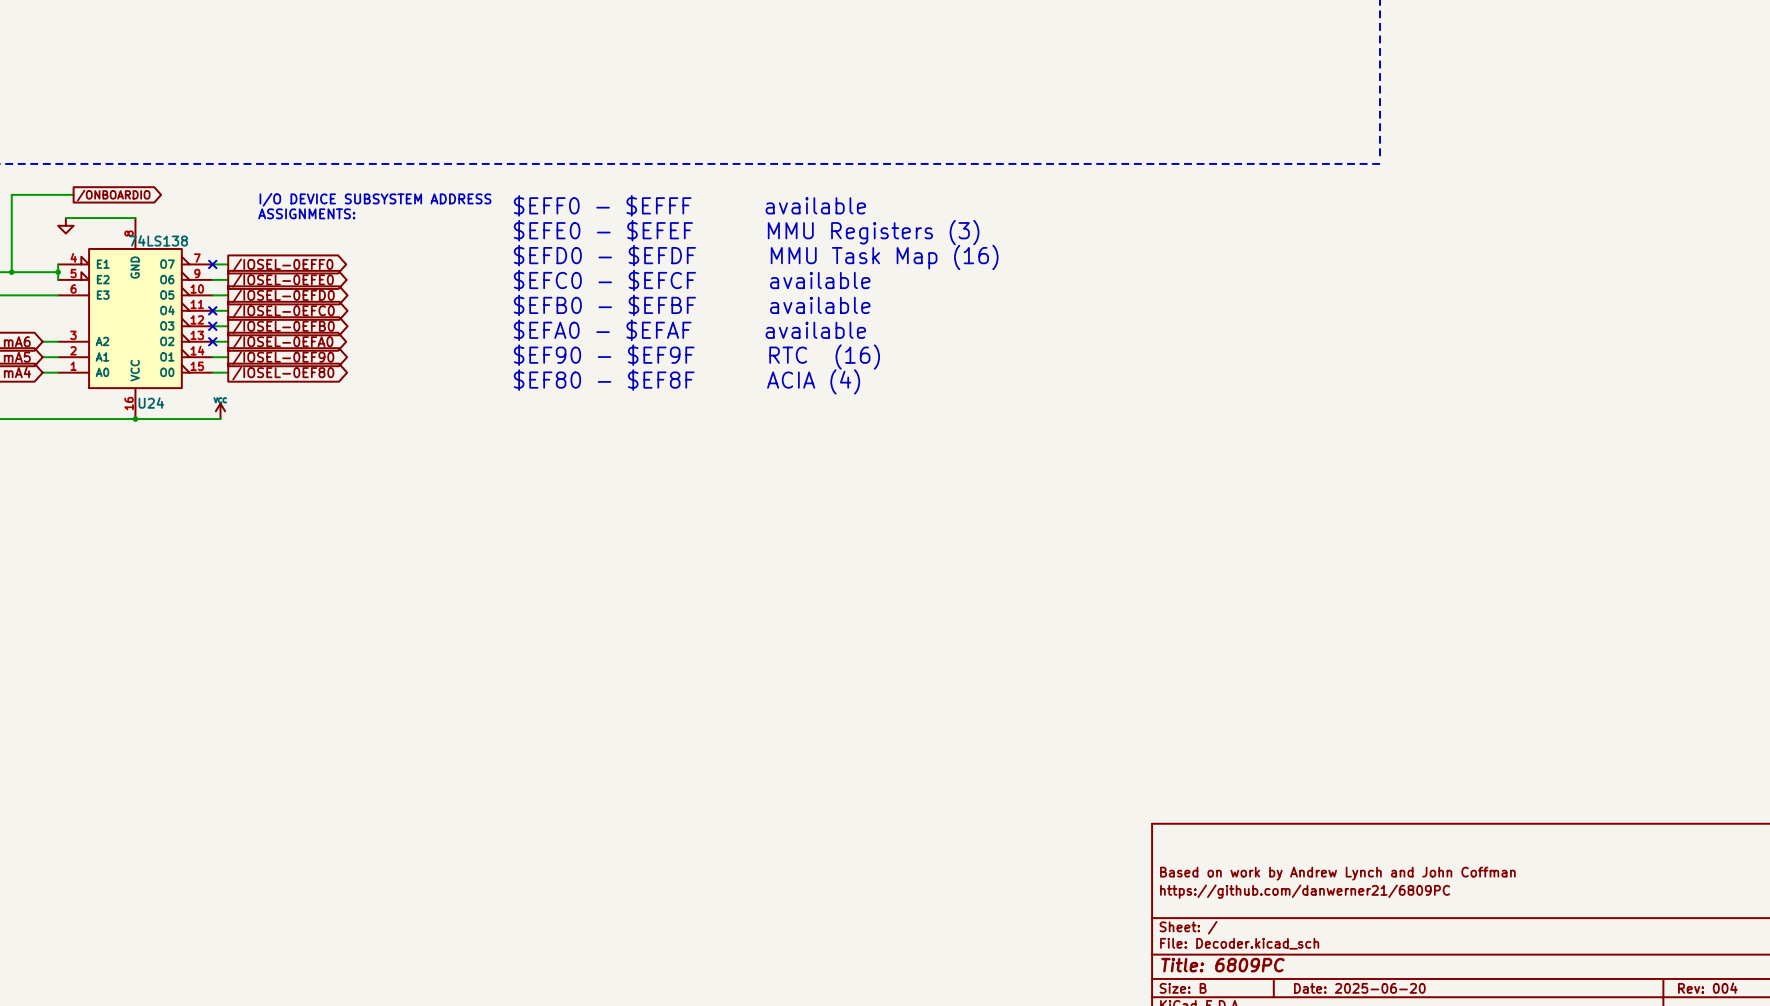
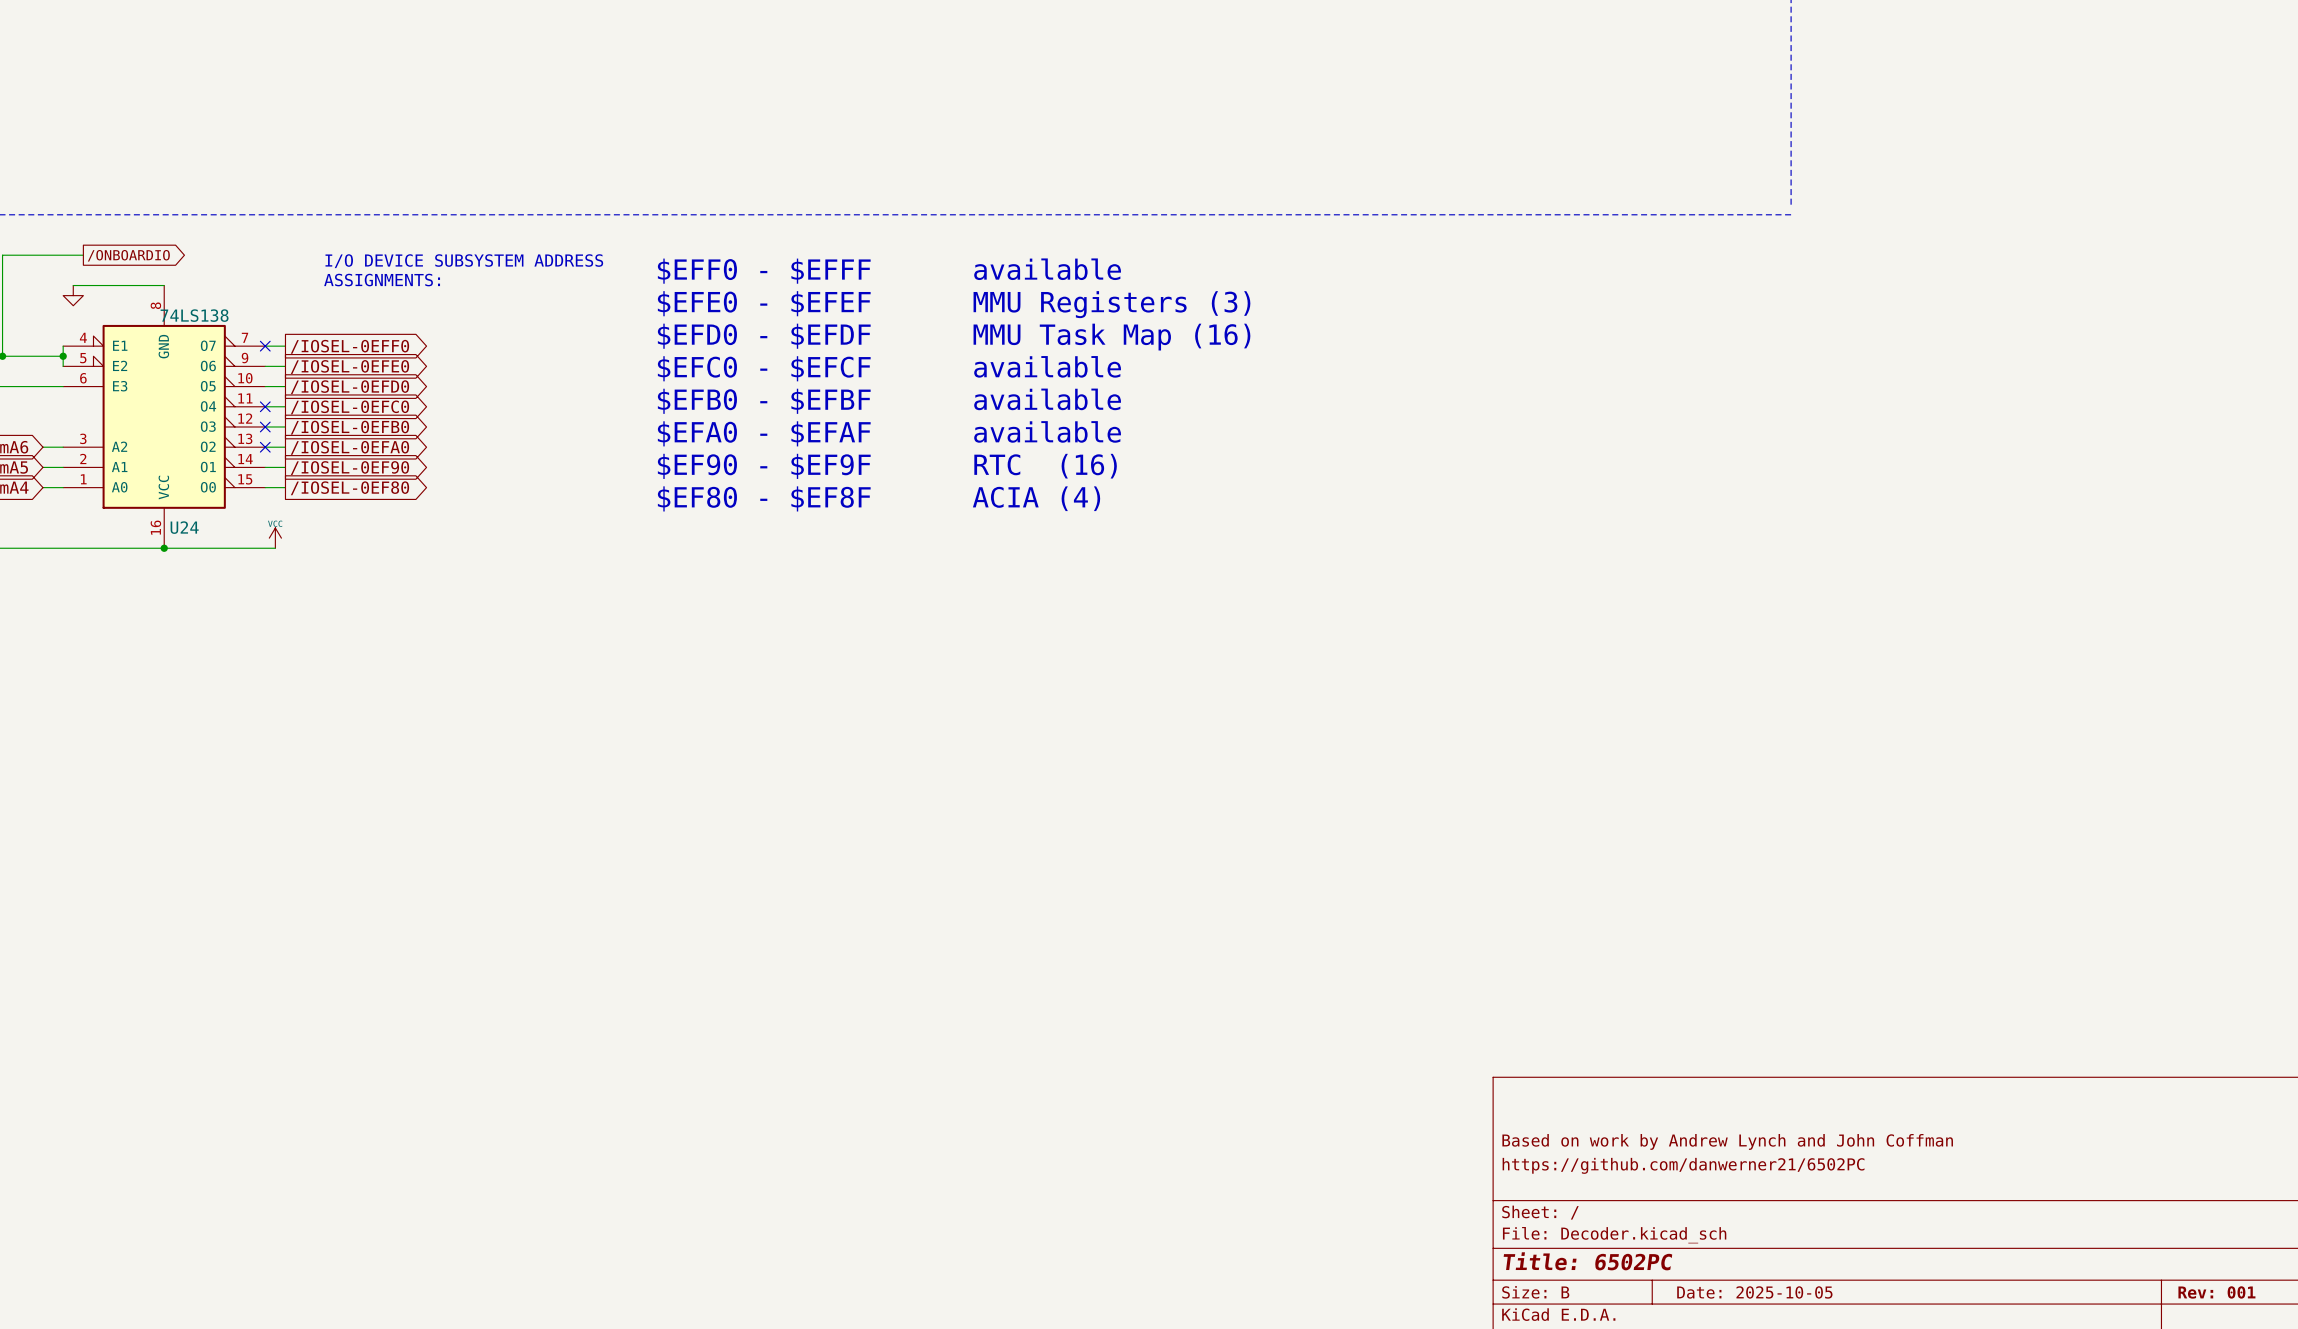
title block: https://github.com/danwerner21/6809PC (1305, 891) -> https://github.com/danwerner21/6502PC (1683, 1165)
title block: Title: 6809PC (1222, 965) -> Title: 6502PC (1587, 1261)
title block: Date: 2025-06-20 (1359, 988) -> Date: 2025-10-05 (1754, 1292)
title block: Rev: 004 (1707, 988) -> Rev: 001 (2216, 1292)

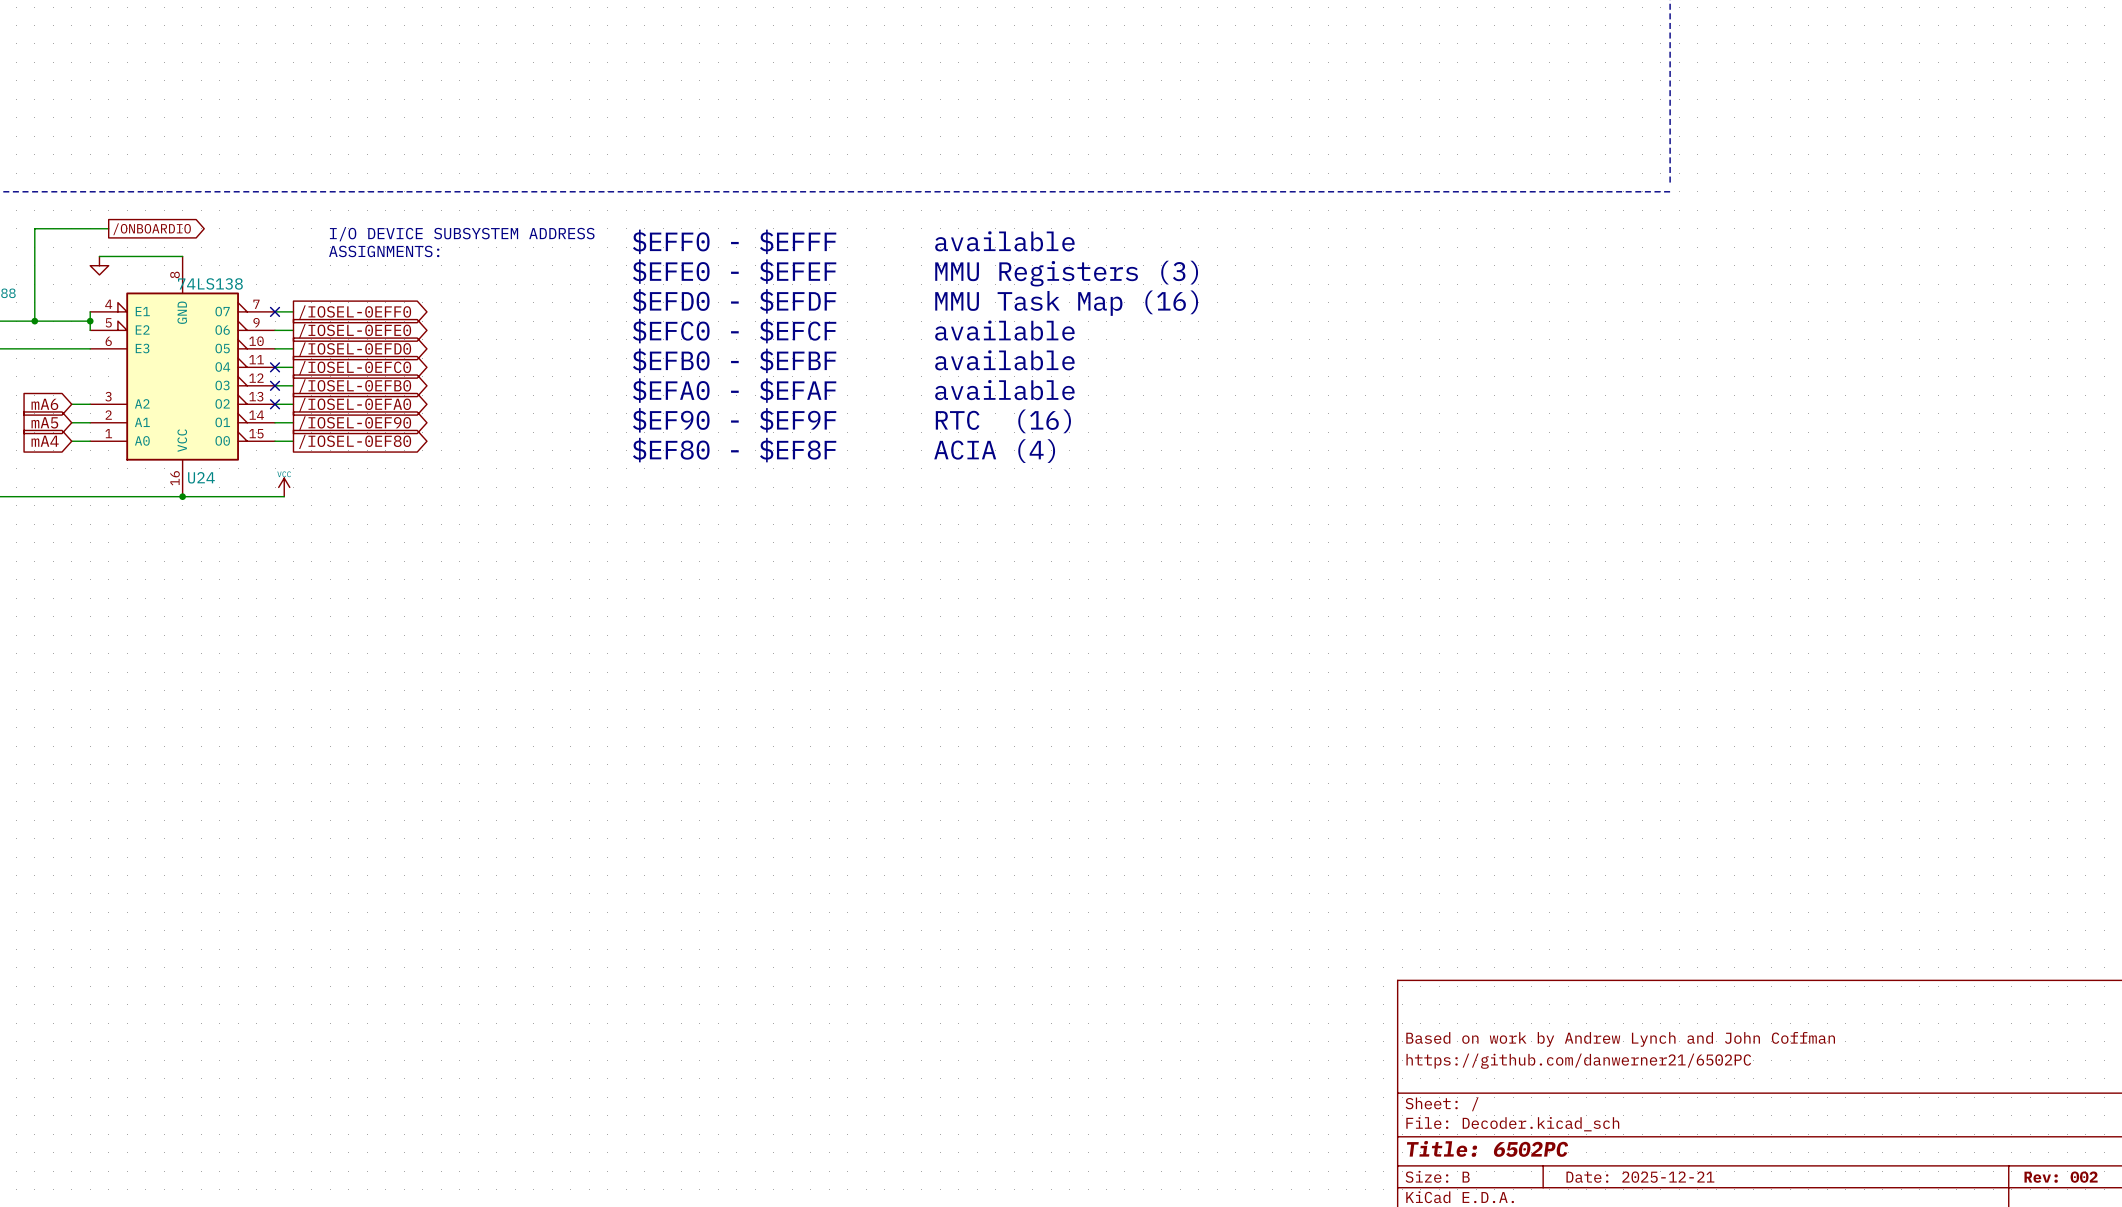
title block: Date: 2025-10-05 (1754, 1292) -> Date: 2025-12-21 (1640, 1177)
title block: Rev: 001 (2216, 1292) -> Rev: 002 (2061, 1177)

